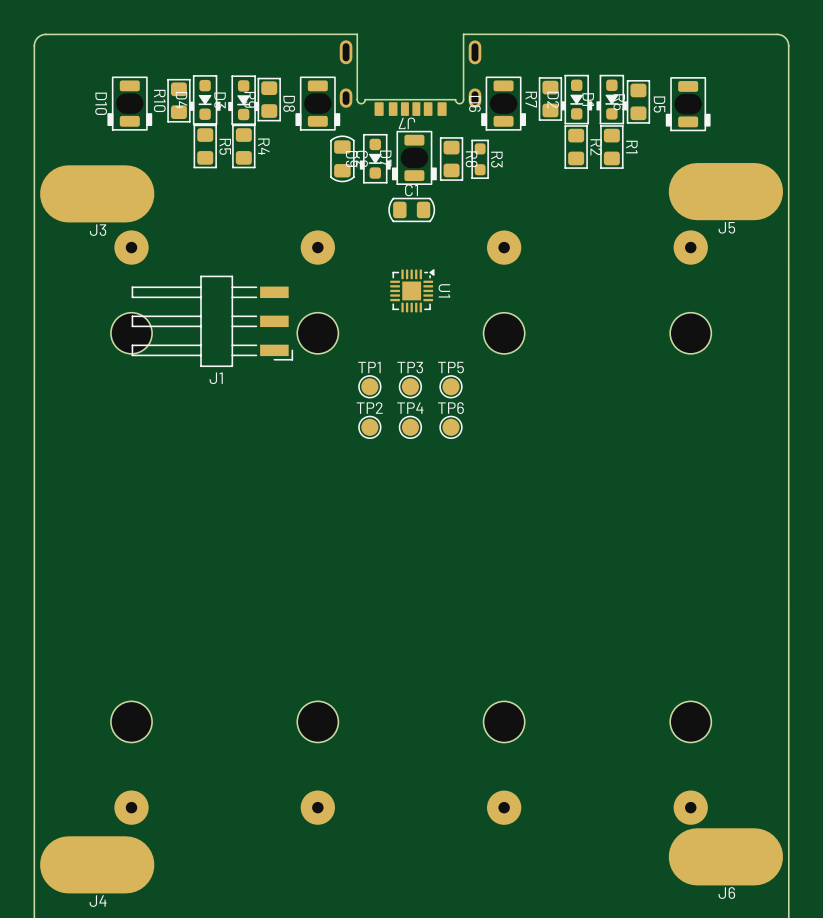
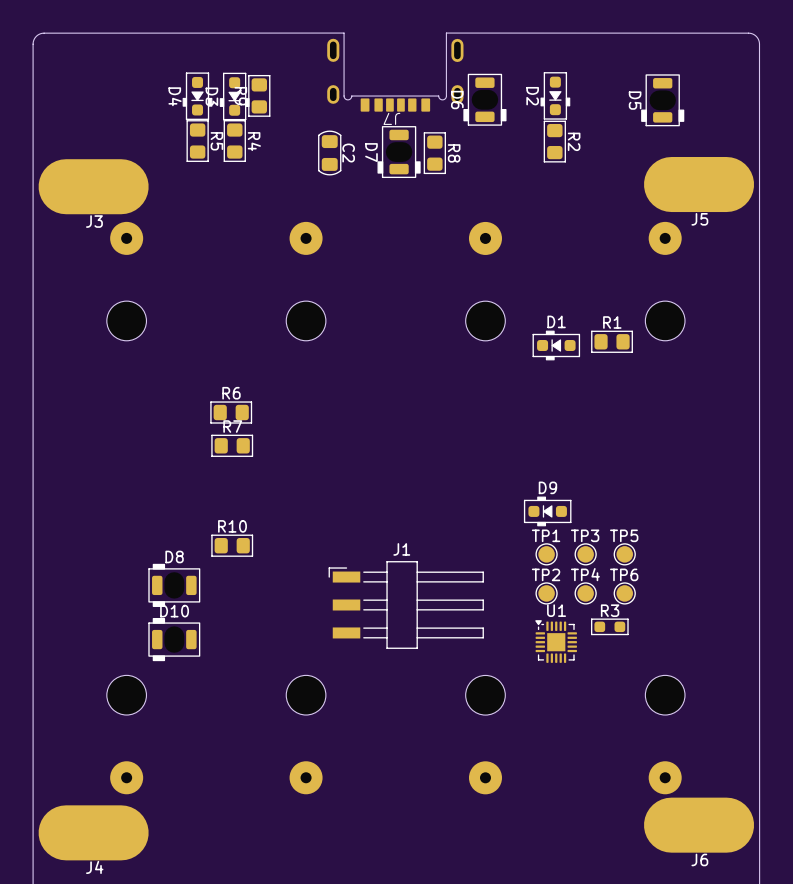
R7 rotation: 0° (550, 99) -> 90° clockwise (232, 445)
R7 position: (550, 99) -> (232, 445)
D1 rotation: 0° (611, 99) -> 90° clockwise (556, 345)
D1 position: (611, 99) -> (556, 345)
R10 rotation: 0° (178, 100) -> 90° clockwise (232, 545)
R10 position: (178, 100) -> (232, 545)
R6 rotation: 0° (638, 101) -> 90° clockwise (231, 412)
R6 position: (638, 101) -> (231, 412)
D10 rotation: 0° (129, 103) -> 90° clockwise (174, 639)
D10 position: (129, 103) -> (174, 639)
D8 rotation: 0° (317, 103) -> 90° clockwise (174, 585)
D8 position: (317, 103) -> (174, 585)
R1 rotation: 0° (611, 147) -> 90° clockwise (612, 341)
R1 position: (611, 147) -> (612, 341)
R1 name position: R1 (631, 147) -> R1 (612, 322)
D9 rotation: 0° (375, 158) -> 90° clockwise (547, 511)
D9 position: (375, 158) -> (547, 511)
R3 rotation: 0° (480, 159) -> 90° clockwise (609, 626)
R3 position: (480, 159) -> (609, 626)
R3 name position: R3 (496, 159) -> R3 (610, 610)
C1: (411, 209) -> none
U1 rotation: 0° (412, 290) -> 90° counterclockwise (556, 641)
U1 position: (412, 290) -> (556, 641)
J1 rotation: 0° (212, 321) -> 180° (406, 605)
J1 position: (212, 321) -> (406, 605)
TP1 position: (369, 386) -> (546, 554)
TP3 position: (410, 386) -> (585, 554)
TP5 position: (450, 386) -> (624, 554)
TP2 position: (369, 427) -> (546, 593)
TP4 position: (410, 427) -> (585, 593)
TP6 position: (450, 427) -> (624, 593)

